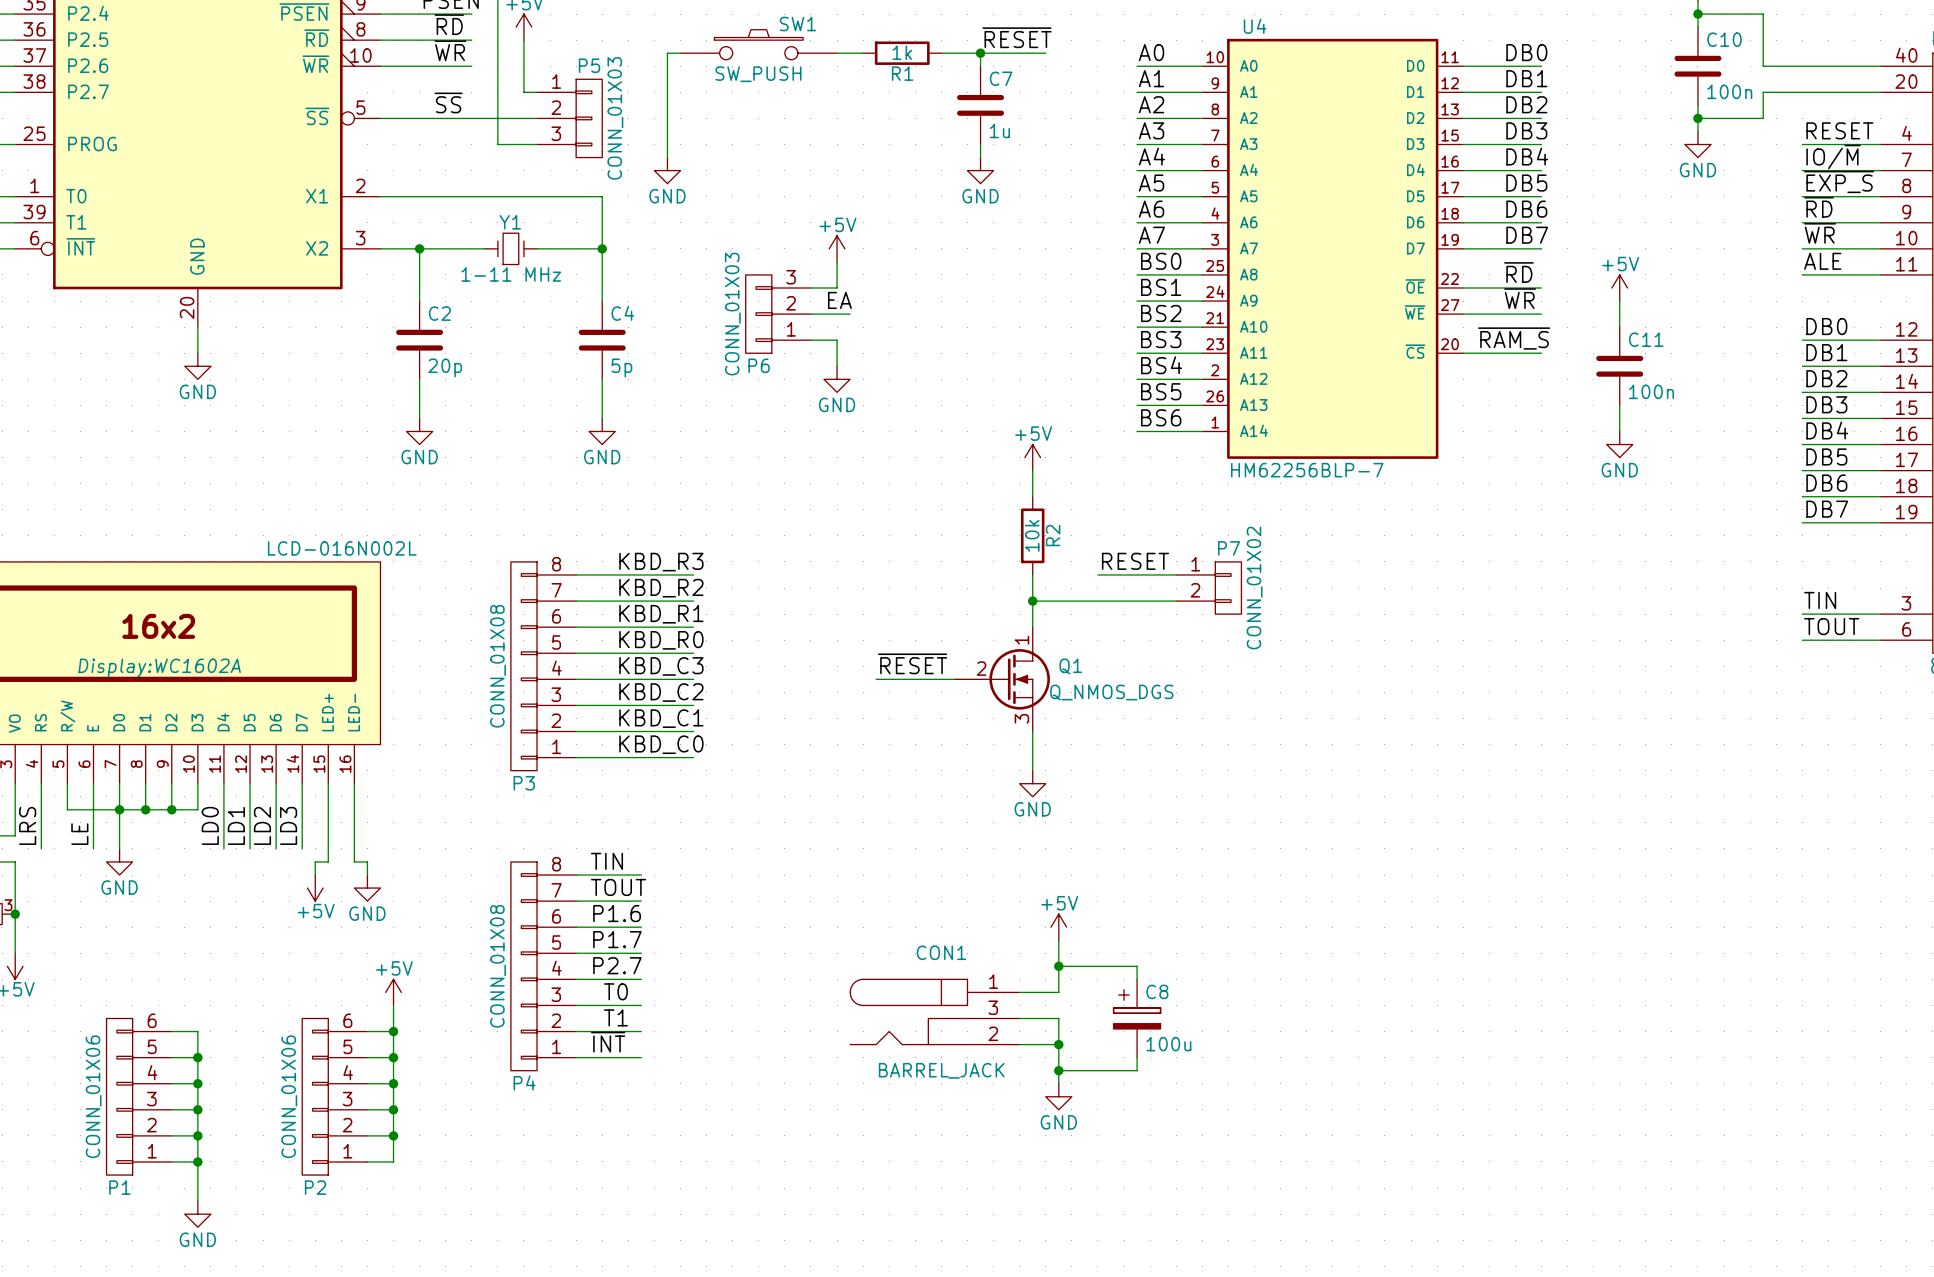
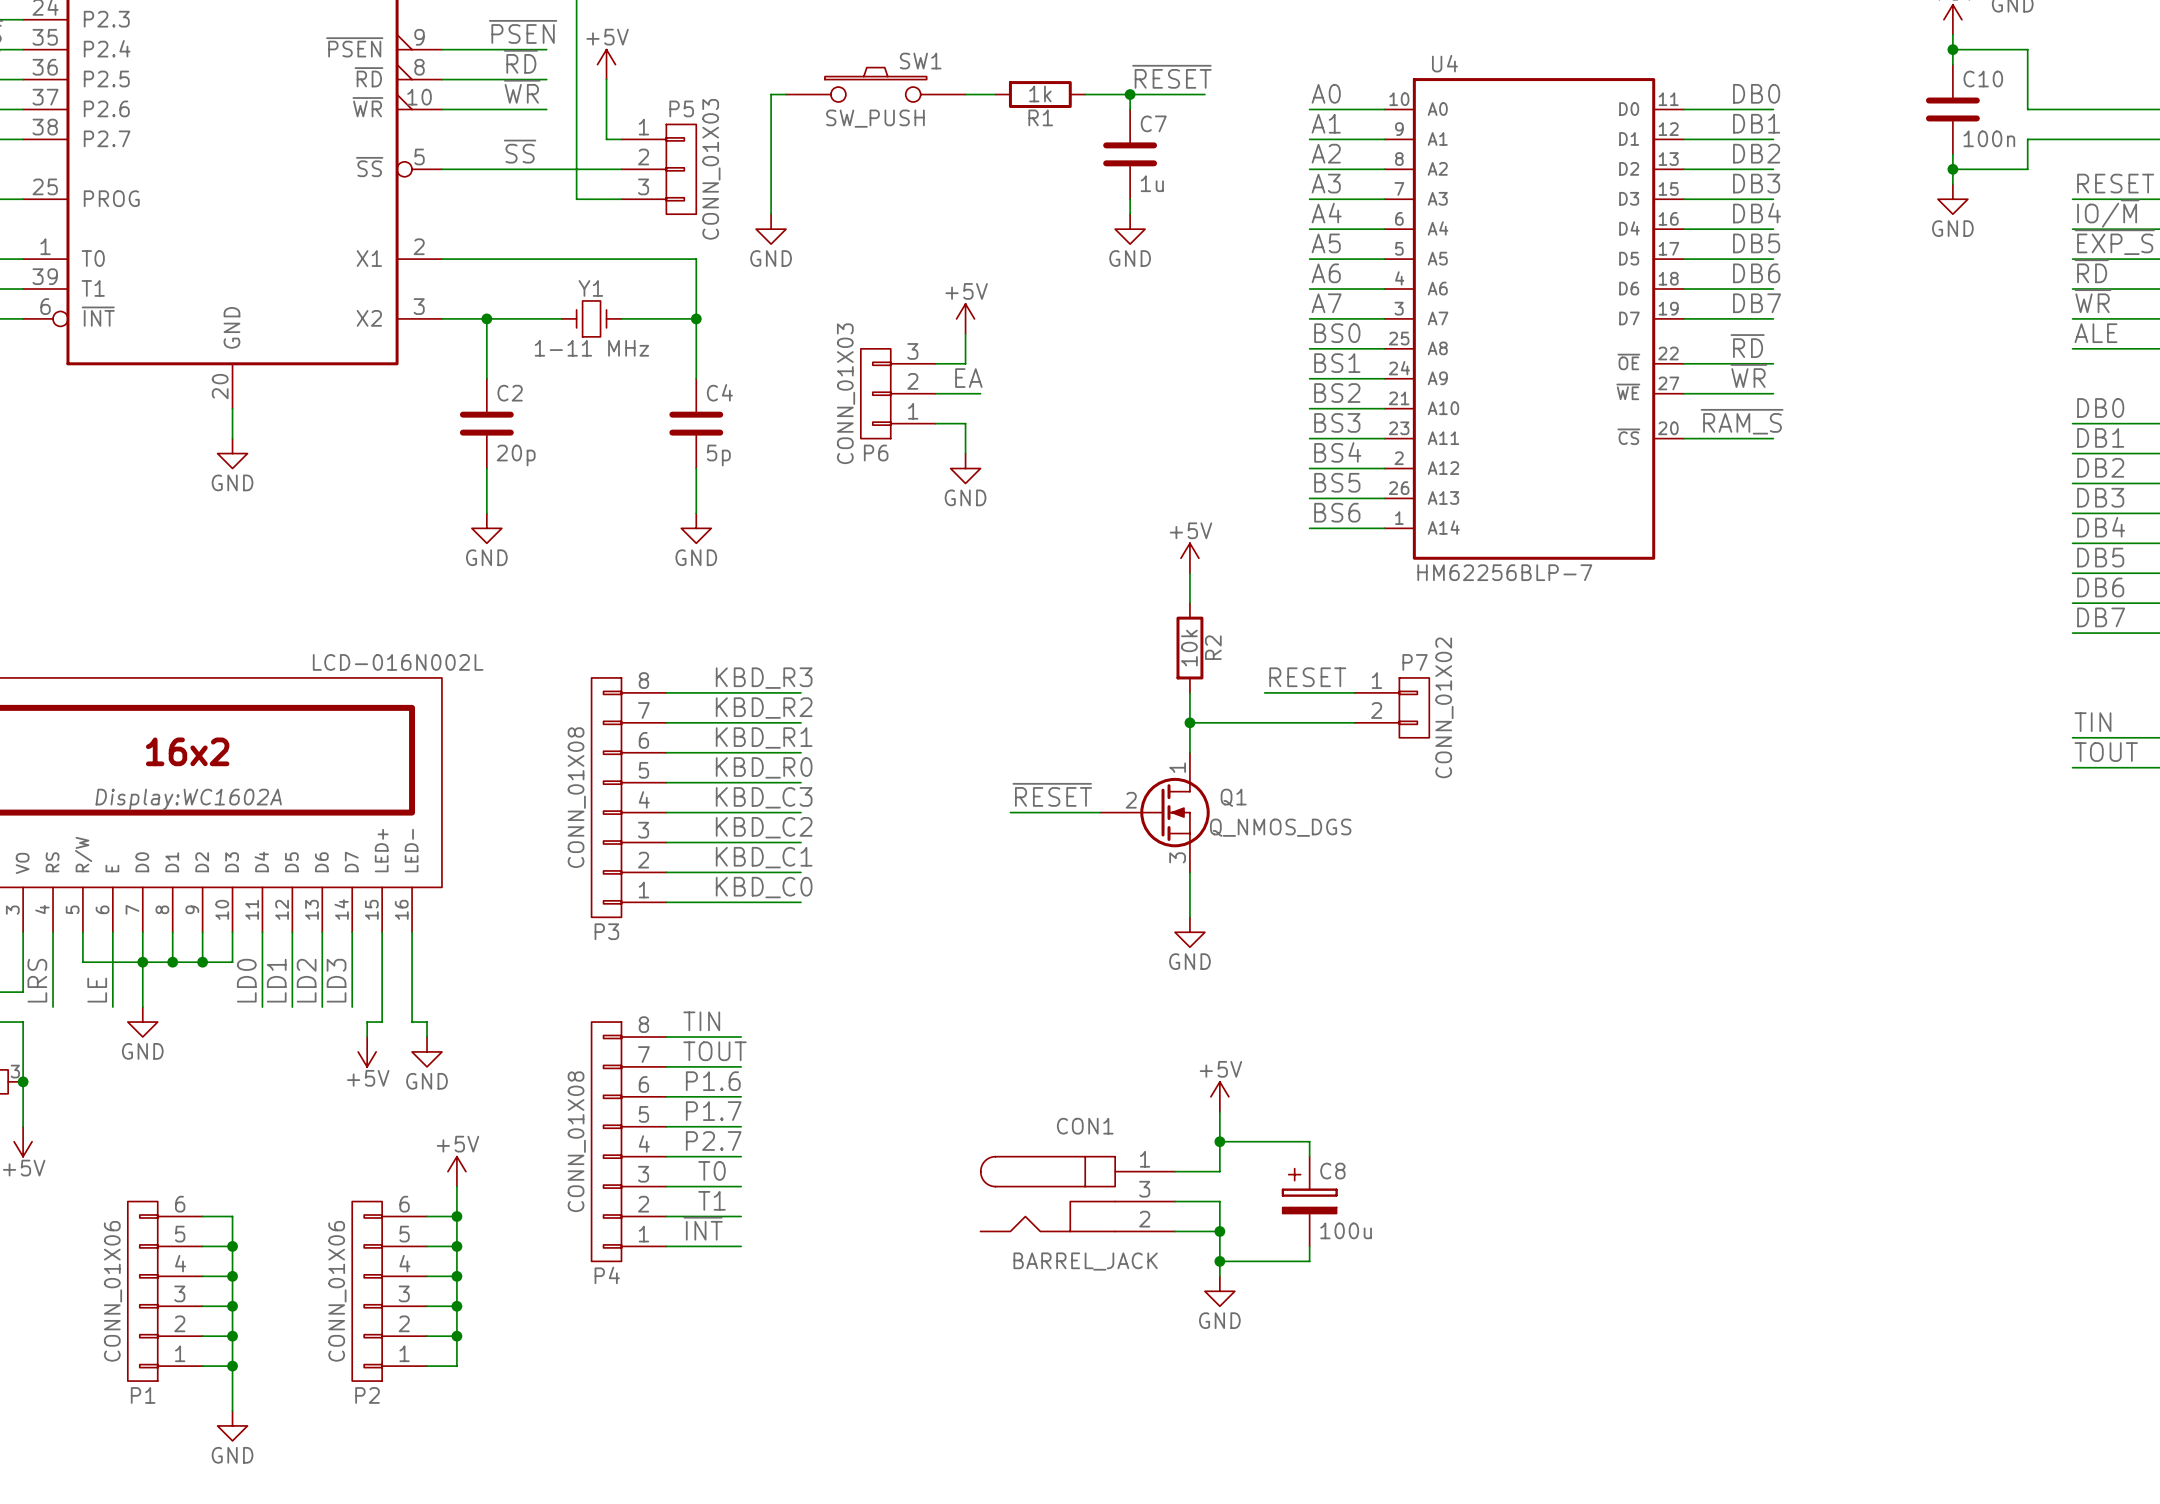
power symbol: +5V (1619, 288) -> none
wire: (1619, 301) (1619, 327) -> none
C11: 100n (1619, 366) -> none
wire: (1619, 405) (1619, 431) -> none
power symbol: GND (1619, 444) -> none

